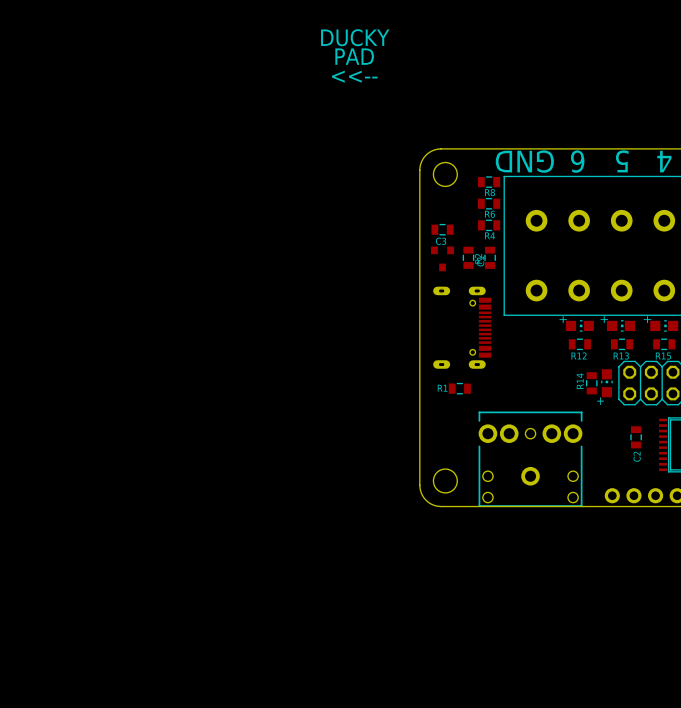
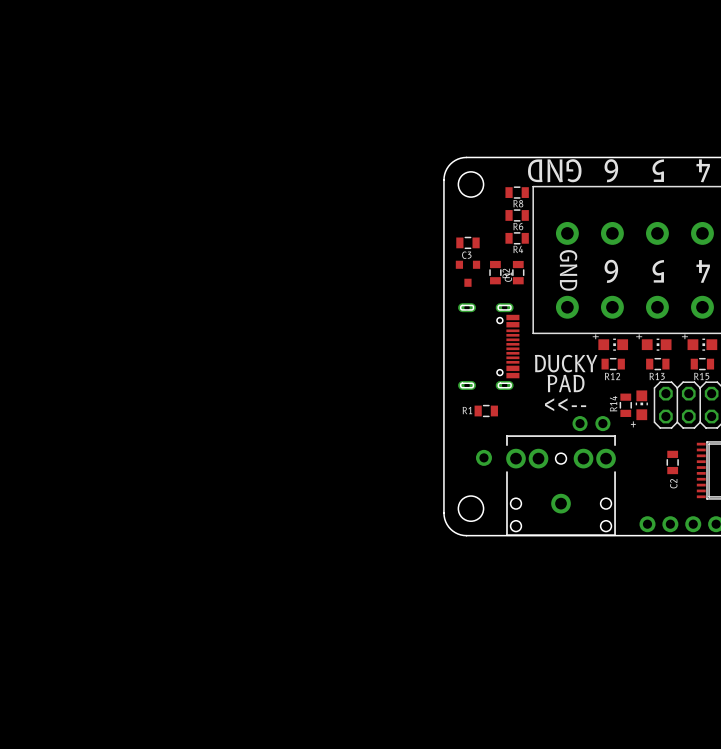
text: DUCKY (355, 37) -> none
text: PAD (354, 56) -> none
text: <<-- (354, 76) -> none
text: none -> GND (568, 270)
text: none -> 6 (611, 271)
text: none -> 5 (658, 271)
text: none -> 4 (703, 271)
text: none -> DUCKY (566, 363)
text: none -> PAD (566, 383)
text: none -> <<-- (565, 404)
part: none -> (591, 423)
part: none -> (483, 457)

